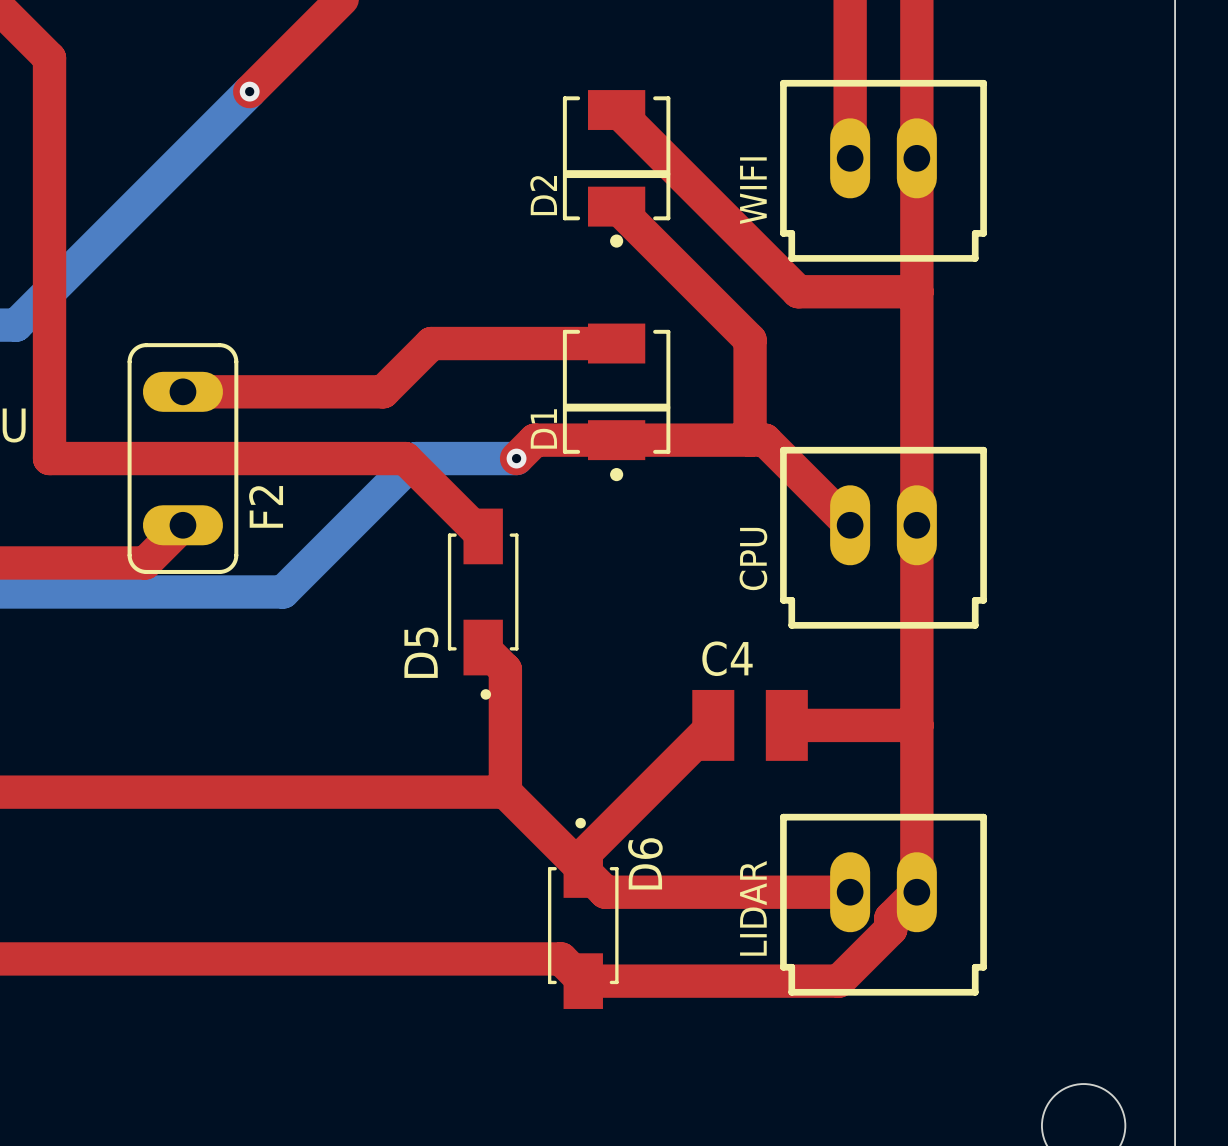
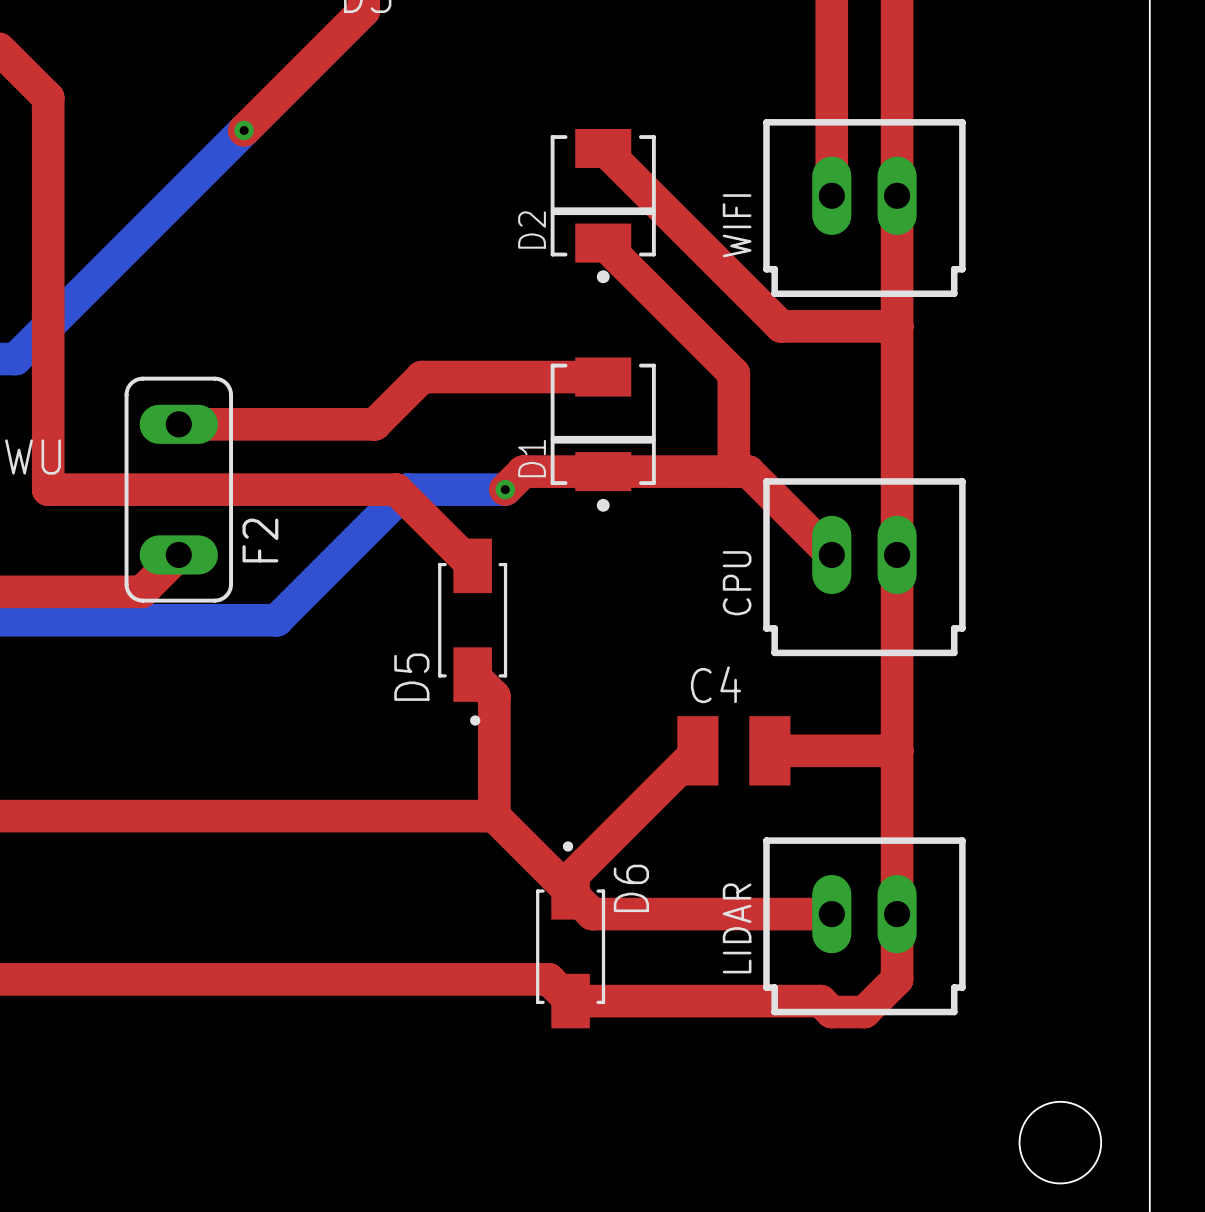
top track: (916, 892) (890, 918) (890, 929) (838, 981) -> (897, 914) (897, 979) (864, 1012) (831, 1012) (820, 1001)

